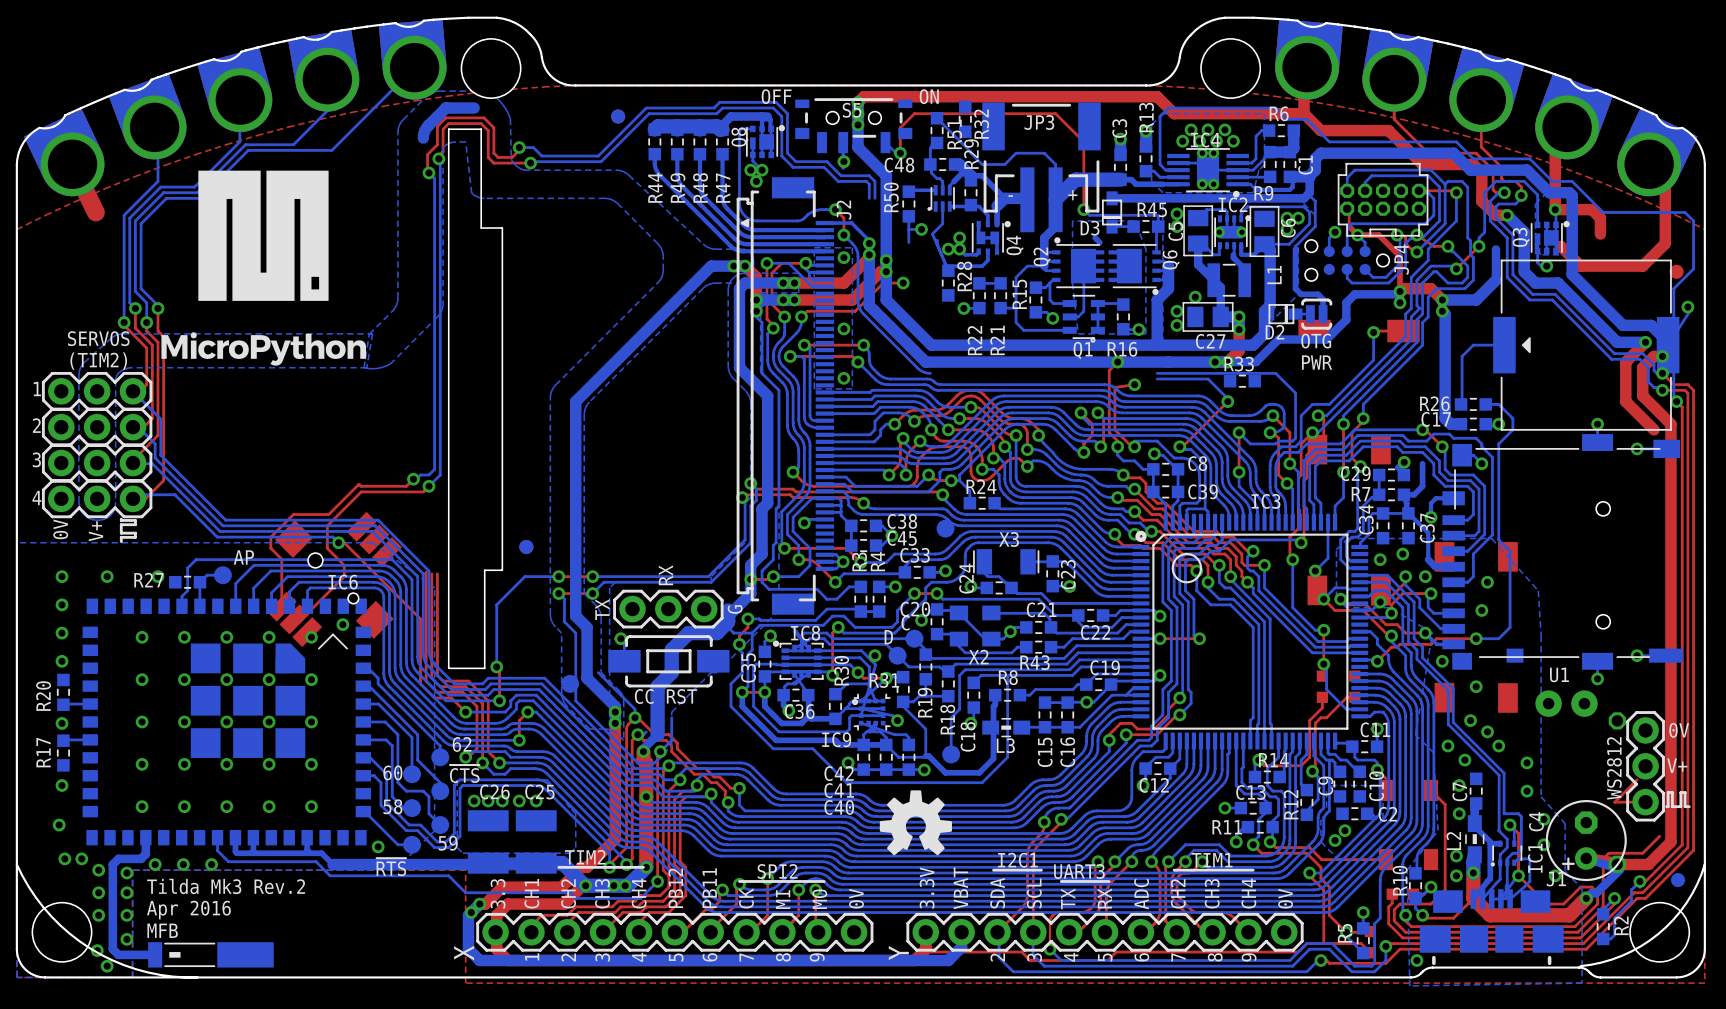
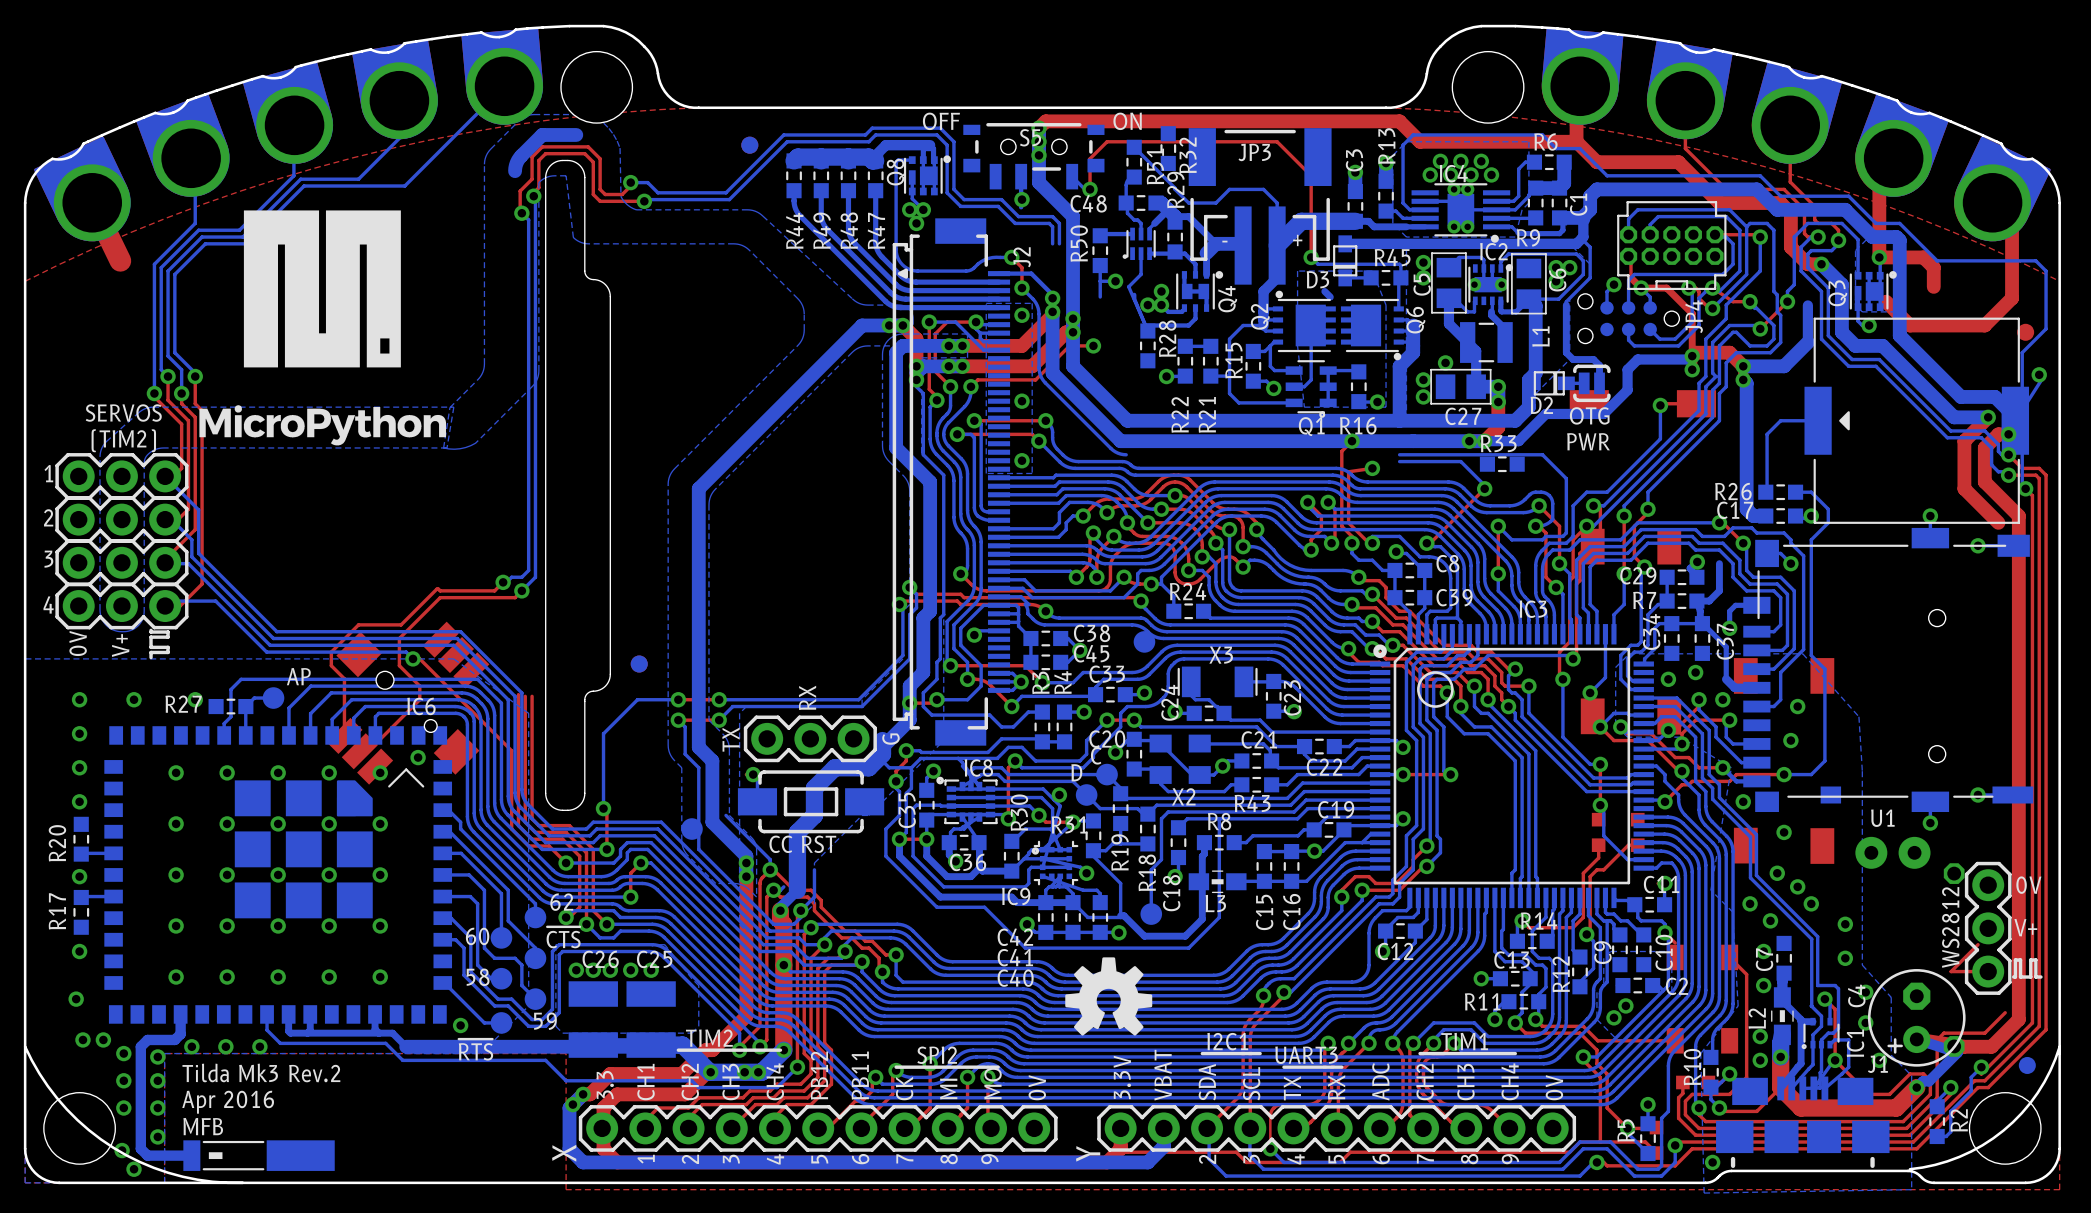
drawing shape: [448, 129, 503, 669] -> [545, 160, 611, 811]

